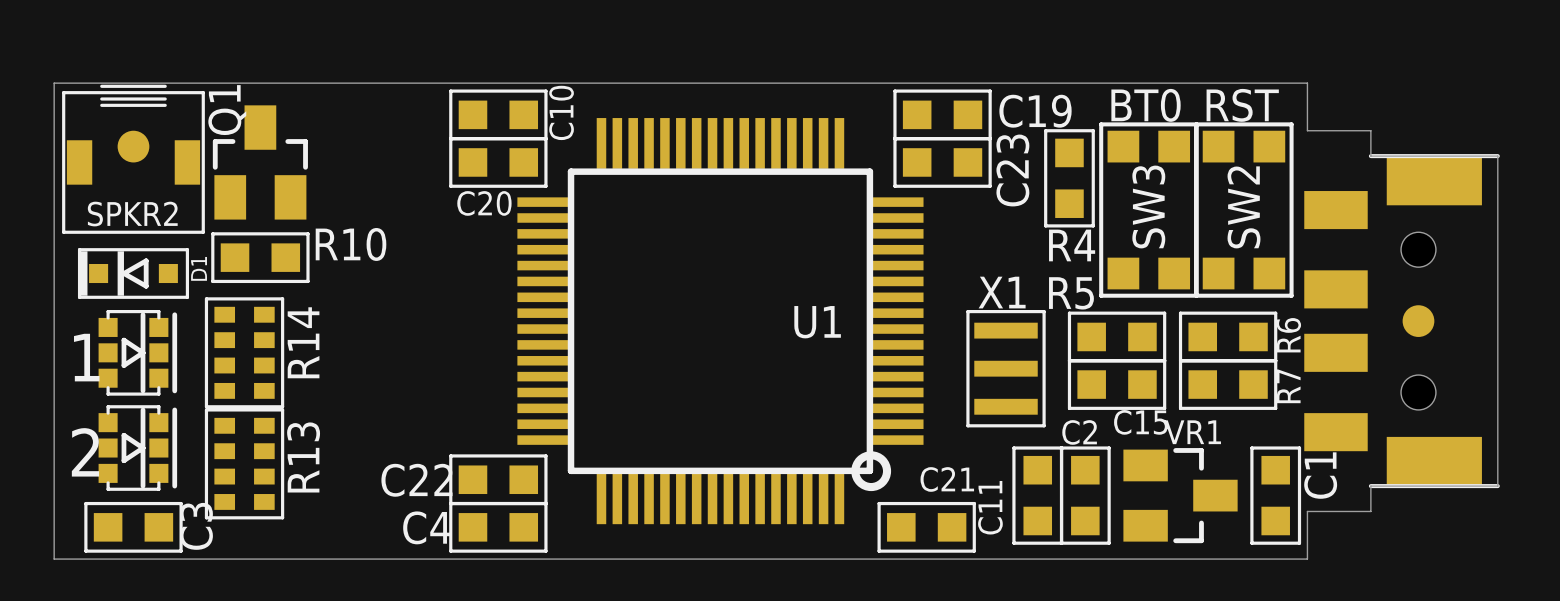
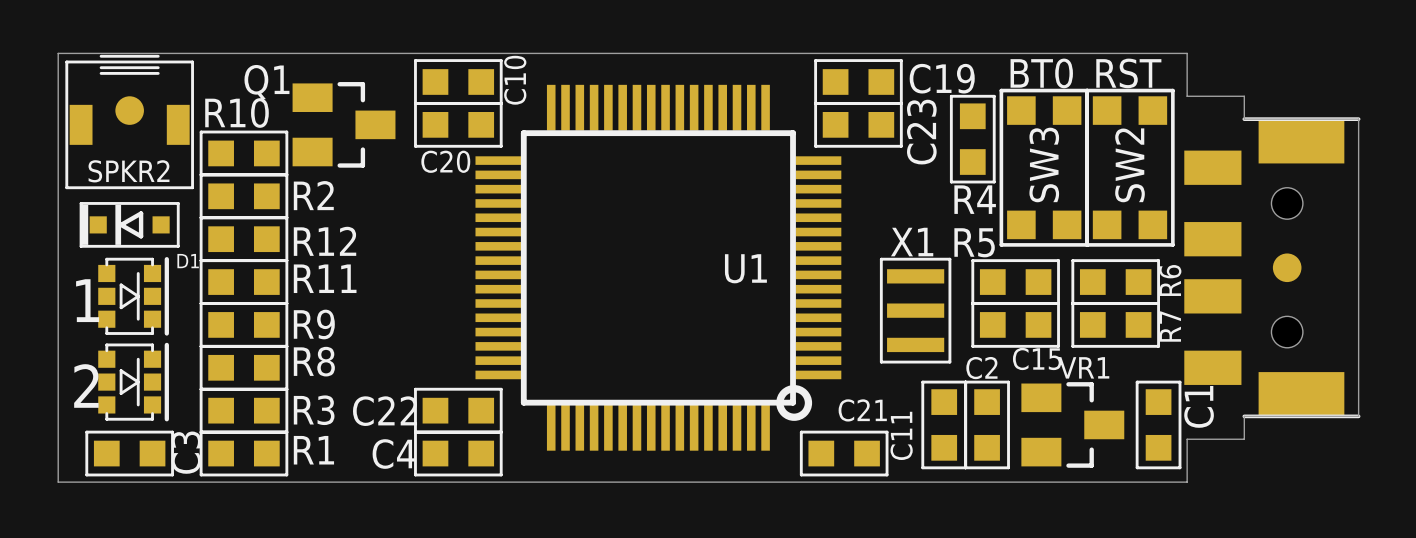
Q1 rotation: 0° (260, 162) -> 90° clockwise (344, 124)
Q1 position: (260, 162) -> (344, 124)
R2: none -> (243, 196)
R10 name position: R10 (351, 244) -> R10 (237, 112)
R10 position: (260, 257) -> (243, 153)
D1 name rotation: 0° (199, 268) -> 90° clockwise (188, 261)
D1 name position: D1 (199, 268) -> D1 (188, 261)
R12: none -> (243, 239)
part footprint: [98, 310, 178, 396] -> [98, 257, 169, 336]
R11: none -> (243, 282)
R14: (244, 352) -> none
R9: none -> (243, 324)
part footprint: [98, 405, 178, 491] -> [98, 342, 169, 422]
R8: none -> (243, 367)
R13: (244, 463) -> none
R3: none -> (243, 410)
R1: none -> (243, 453)

